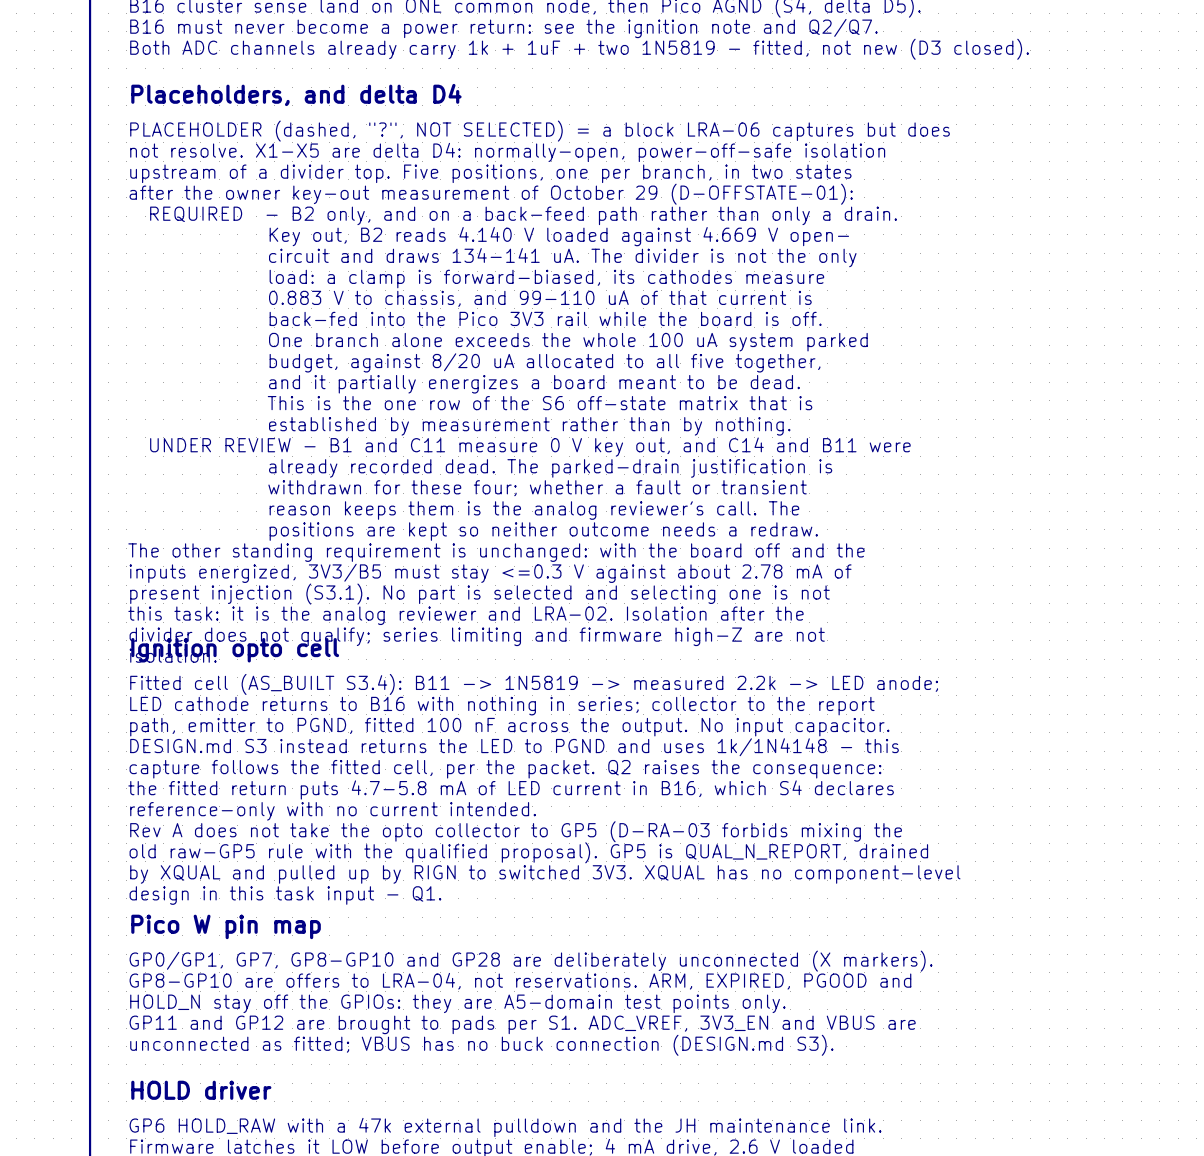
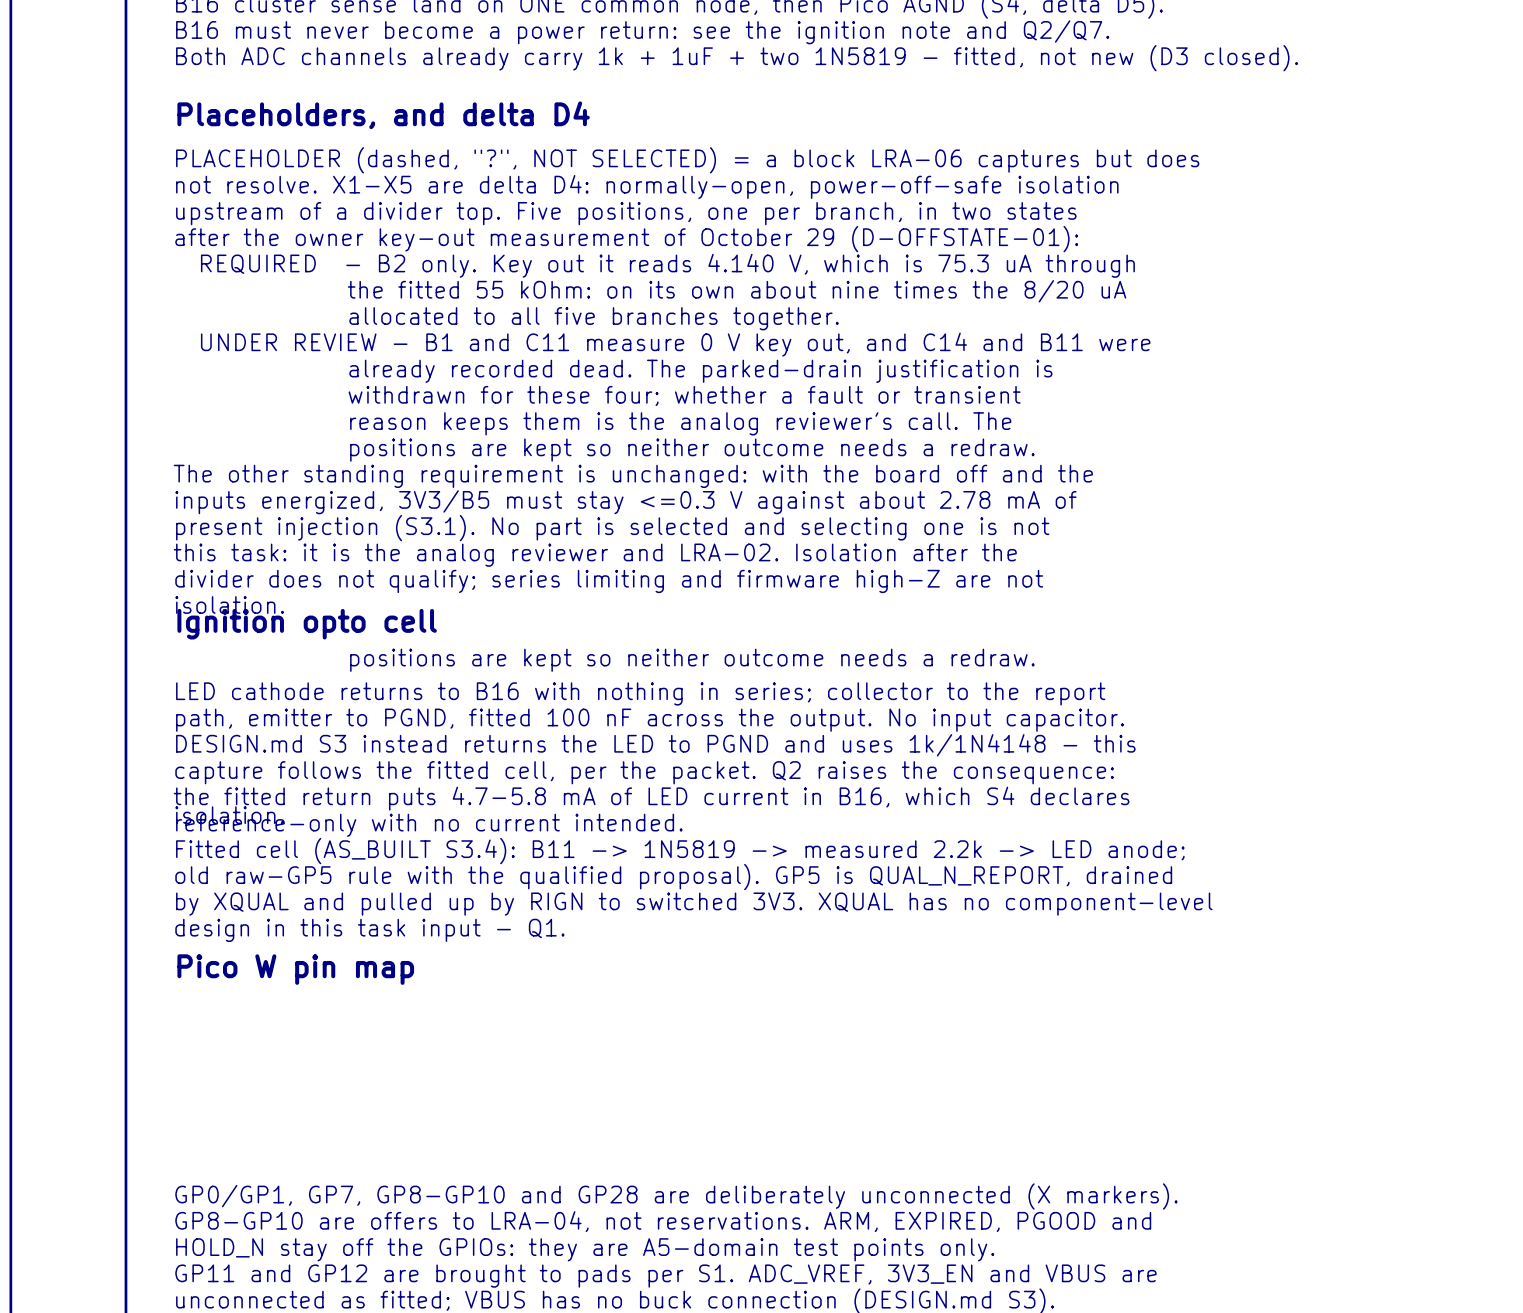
text: REQUIRED - B2 only, and on a back-feed path rather than only a drain. (523, 215) -> REQUIRED - B2 only. Key out it reads 4.140 V, which is 75.3 uA through (667, 265)
text: Key out, B2 reads 4.140 V loaded against 4.669 V open- (559, 236) -> the fitted 55 kOhm: on its own about nine times the 8/20 uA (737, 291)
text: circuit and draws 134-141 uA. The divider is not the only (562, 257) -> allocated to all five branches together. (594, 318)
text: load: a clamp is forward-biased, its cathodes measure (546, 279) -> UNDER REVIEW - B1 and C11 measure 0 V key out, and C14 and B11 were (675, 344)
text: 0.883 V to chassis, and 99-110 uA of that current is (540, 298) -> already recorded dead. The parked-drain justification is (700, 371)
text: back-fed into the Pico 3V3 rail while the board is off. (545, 318) -> withdrawn for these four; whether a fault or transient (684, 395)
text: One branch alone exceeds the whole 100 uA system parked (568, 342) -> reason keeps them is the analog reviewer's call. The (680, 423)
text: budget, against 8/20 uA allocated to all five together, (545, 362) -> positions are kept so neither outcome needs a redraw. (692, 450)
text: and it partially energizes a board meant to be dead. (534, 384) -> The other standing requirement is unchanged: with the board off and the (633, 476)
text: This is the one row of the S6 off-state matrix that is (540, 403) -> inputs energized, 3V3/B5 must stay <=0.3 V against about 2.78 mA of (625, 502)
text: established by measurement rather than by nothing. (529, 426) -> present injection (S3.1). No part is selected and selecting one is not (612, 528)
text: UNDER REVIEW - B1 and C11 measure 0 V key out, and C14 and B11 were (530, 447) -> this task: it is the analog reviewer and LRA-02. Isolation after the (595, 555)
text: already recorded dead. The parked-drain justification is (550, 468) -> divider does not qualify; series limiting and firmware high-Z are not (609, 581)
text: withdrawn for these four; whether a fault or transient (537, 488) -> isolation. (229, 604)
text: reason keeps them is the analog reviewer's call. The (534, 510) -> none
text: The other standing requirement is unchanged: with the board off and the (496, 552) -> LED cathode returns to B16 with nothing in series; collector to the report (640, 693)
text: inputs energized, 3V3/B5 must stay <=0.3 V against about 2.78 mA of (490, 573) -> path, emitter to PGND, fitted 100 nF across the output. No input capacitor. (650, 720)
text: present injection (S3.1). No part is selected and selecting one is not (479, 594) -> DESIGN.md S3 instead returns the LED to PGND and uses 1k/1N4148 - this (655, 745)
text: this task: it is the analog reviewer and LRA-02. Isolation after the (465, 615) -> none
text: divider does not qualify; series limiting and firmware high-Z are not (477, 636) -> none
text position: Ignition opto cell (235, 650) -> Ignition opto cell (307, 624)
text: LED cathode returns to B16 with nothing in series; collector to the report (502, 706) -> old raw-GP5 rule with the qualified proposal). GP5 is QUAL_N_REPORT, drained (673, 877)
text: path, emitter to PGND, fitted 100 nF across the output. No input capacitor. (509, 727) -> by XQUAL and pulled up by RIGN to switched 3V3. XQUAL has no component-level (694, 904)
text: DESIGN.md S3 instead returns the LED to PGND and uses 1k/1N4148 - this (514, 747) -> design in this task input - Q1. (369, 930)
text position: capture follows the fitted cell, per the packet. Q2 raises the consequence: (505, 769) -> capture follows the fitted cell, per the packet. Q2 raises the consequence: (644, 772)
text position: the fitted return puts 4.7-5.8 mA of LED current in B16, which S4 declares (511, 789) -> the fitted return puts 4.7-5.8 mA of LED current in B16, which S4 declares (651, 798)
text position: reference-only with no current intended. (333, 811) -> reference-only with no current intended. (429, 825)
text: Rev A does not take the opto collector to GP5 (D-RA-03 forbids mixing the (516, 831) -> none
text: old raw-GP5 rule with the qualified proposal). GP5 is QUAL_N_REPORT, drained (528, 852) -> none
text: by XQUAL and pulled up by RIGN to switched 3V3. XQUAL has no component-level (545, 874) -> none
text: design in this task input - Q1. (285, 895) -> none
text position: Pico W pin map (226, 926) -> Pico W pin map (295, 969)

